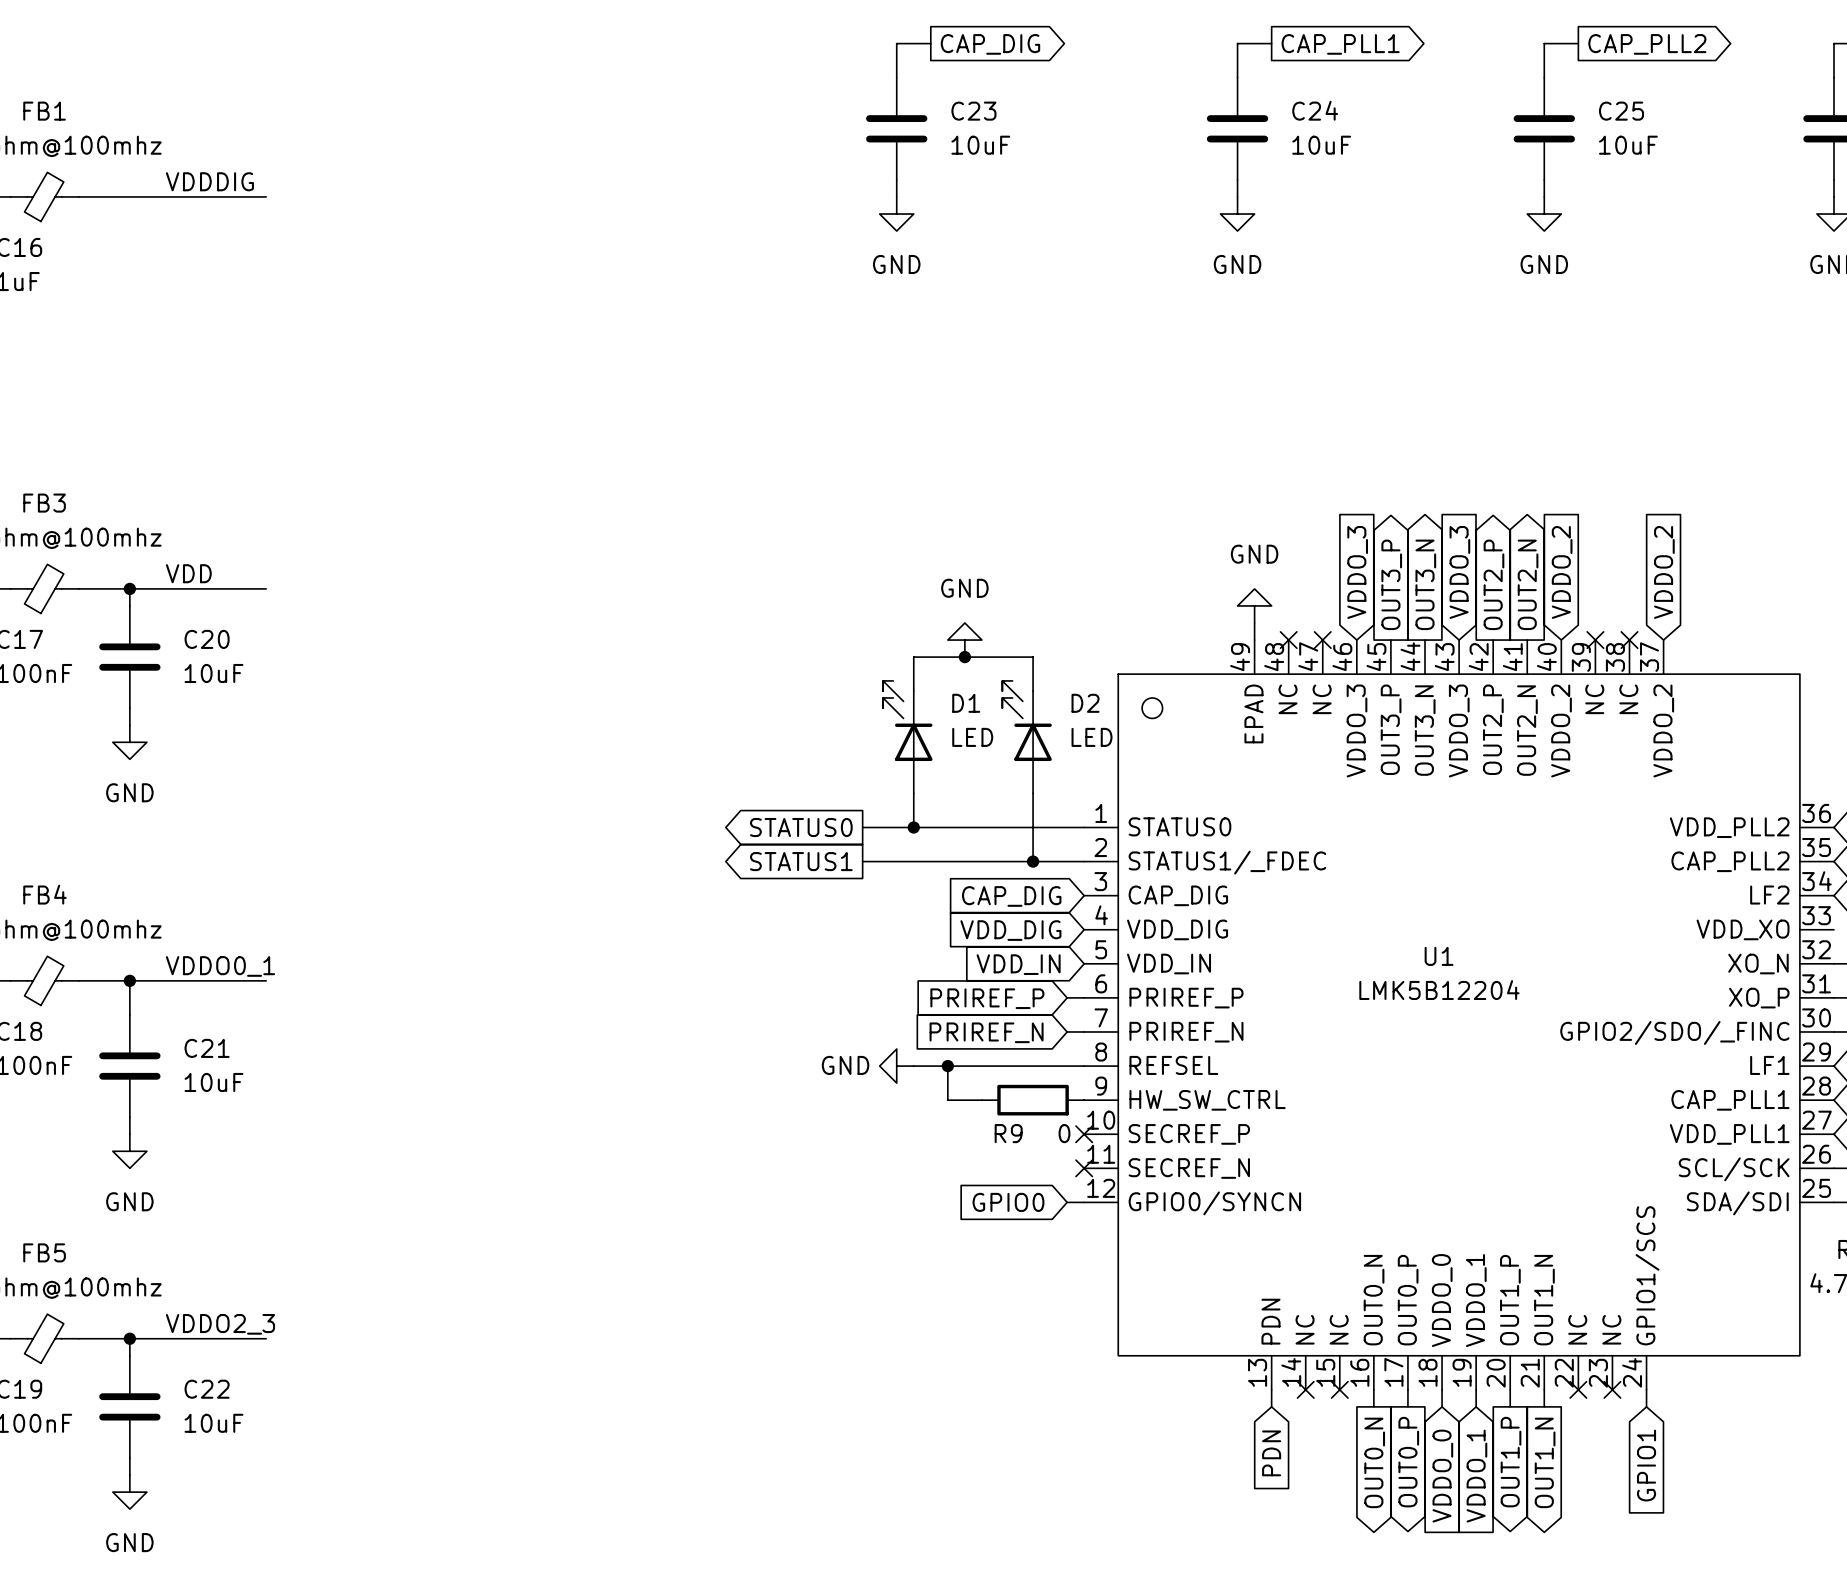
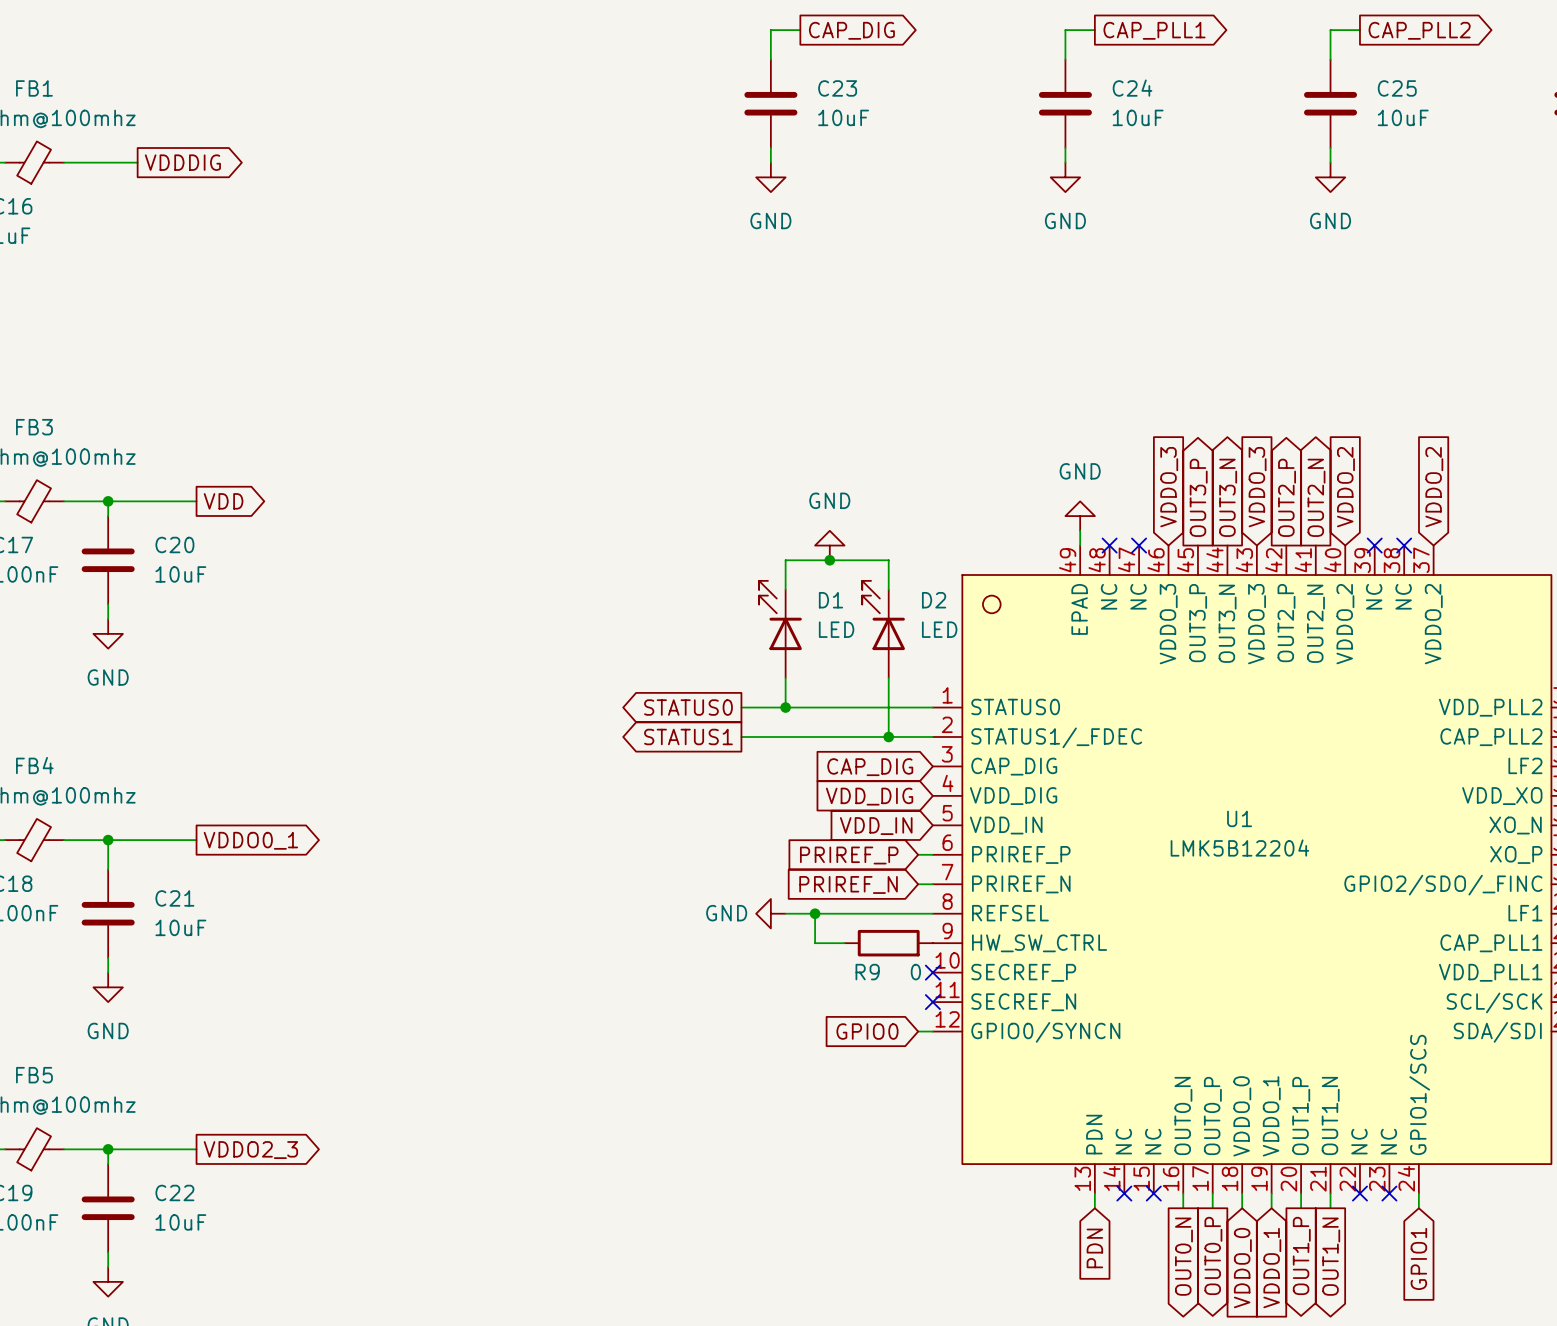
label: VDDDIG (209, 181) -> none
wire: (163, 196) (266, 196) -> none
global label: none -> VDDDIG (182, 162)
label: VDD (188, 573) -> none
wire: (232, 588) (266, 588) -> none
global label: none -> VDD (223, 501)
label: VDDO0_1 (220, 966) -> none
wire: (232, 980) (266, 980) -> none
global label: none -> VDDO0_1 (250, 840)
label: VDDO2_3 (220, 1324) -> none
wire: (232, 1338) (266, 1338) -> none
global label: none -> VDDO2_3 (250, 1150)

